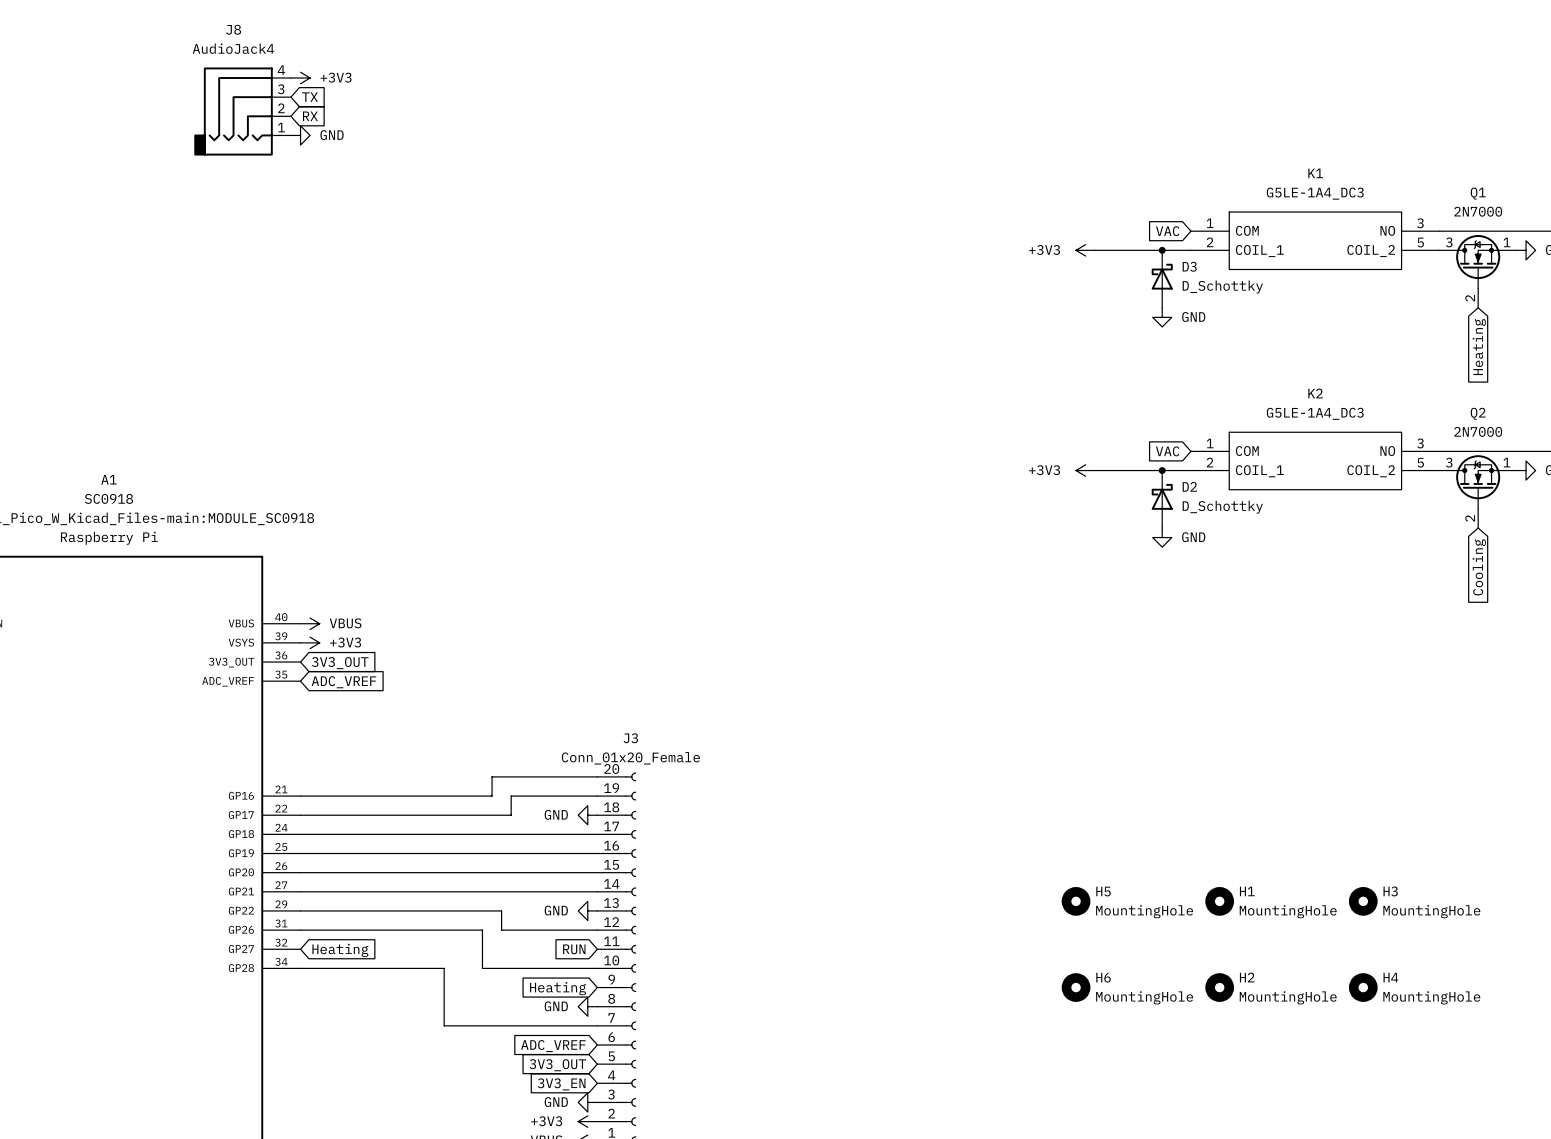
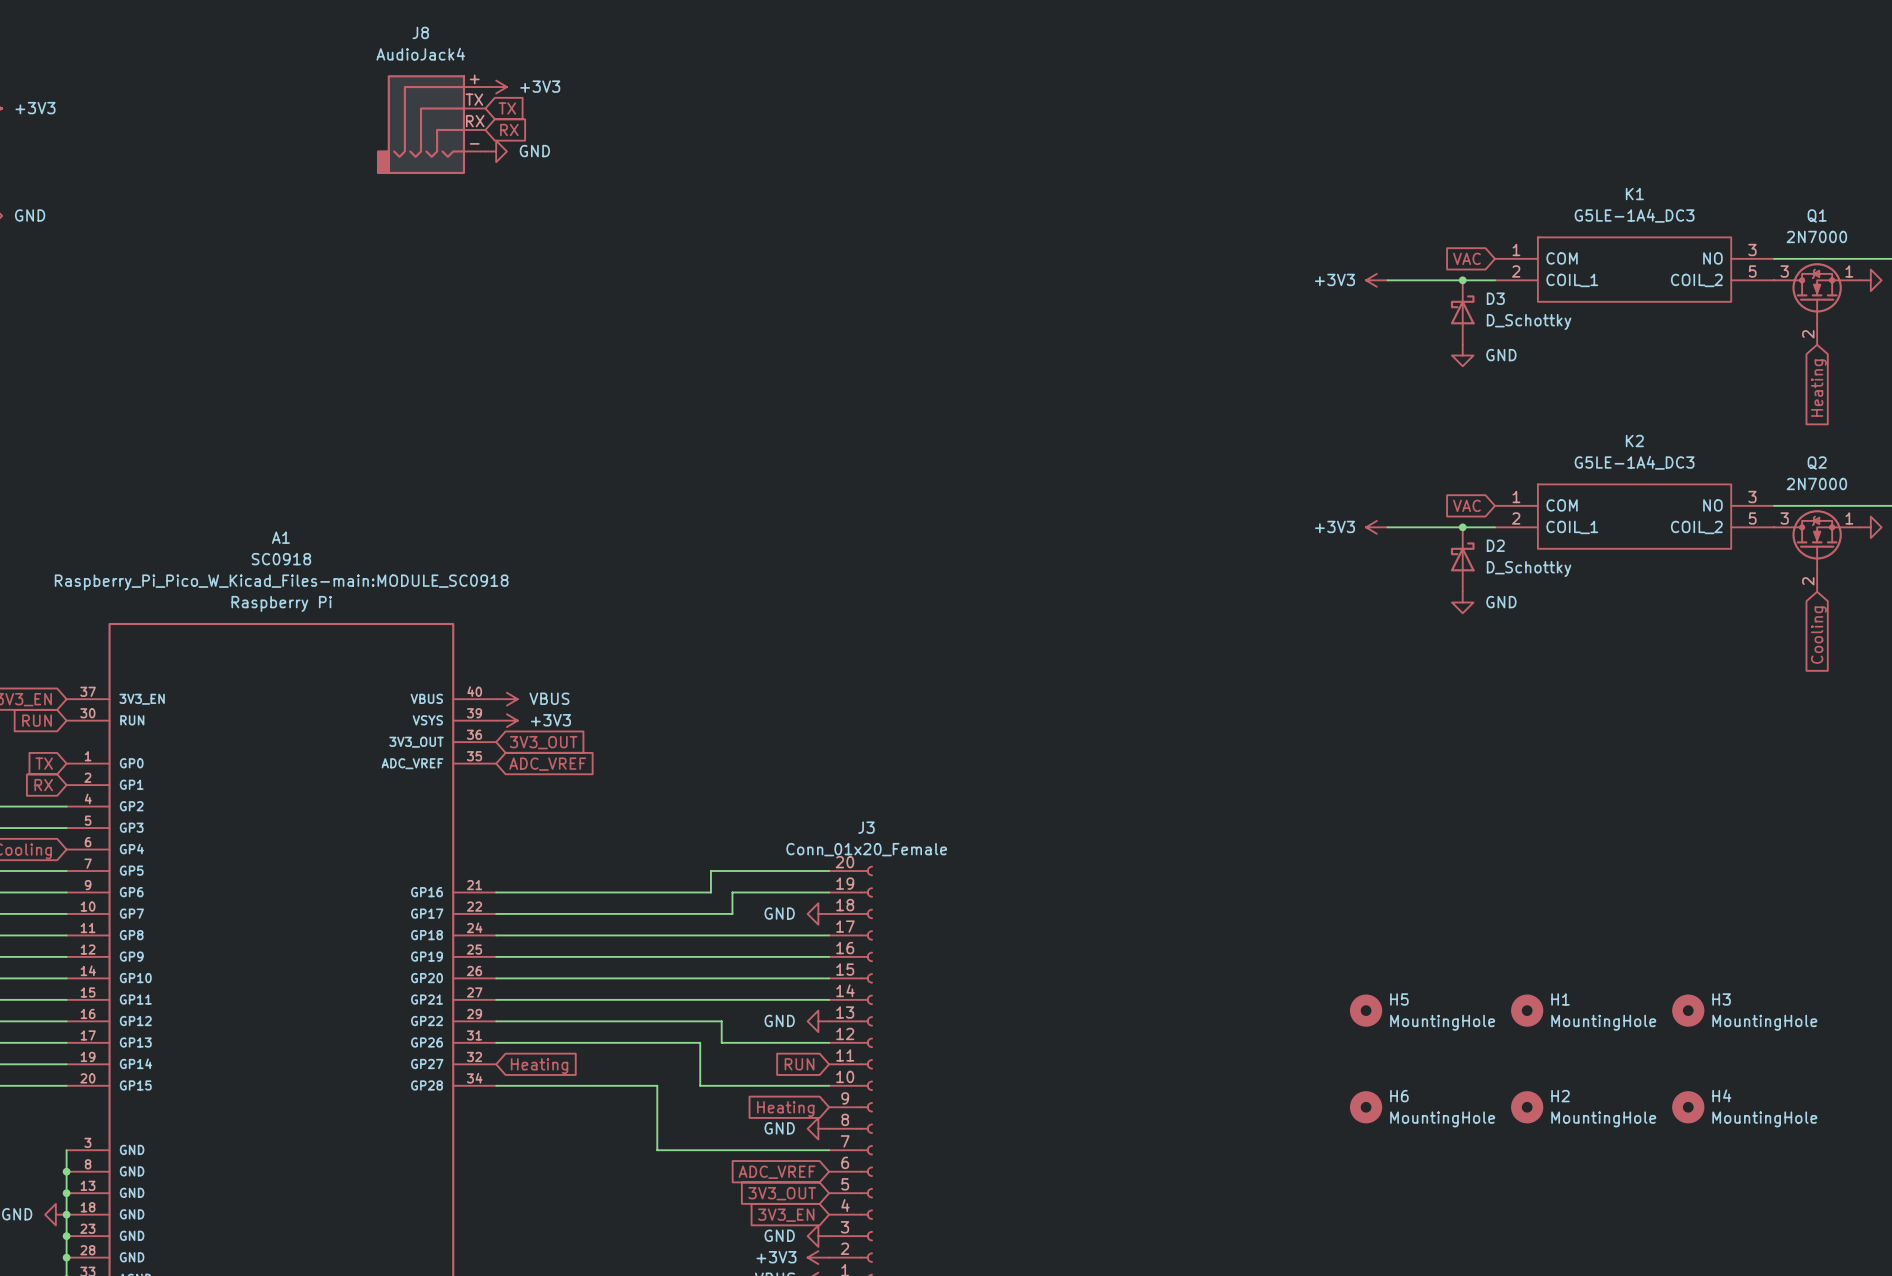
J8 pin number: 4 (281, 70) -> + (474, 79)
J8 pin number: 3 (281, 89) -> TX (474, 99)
J8 pin number: 2 (281, 108) -> RX (475, 121)
J8 pin number: 1 (281, 127) -> - (474, 143)

